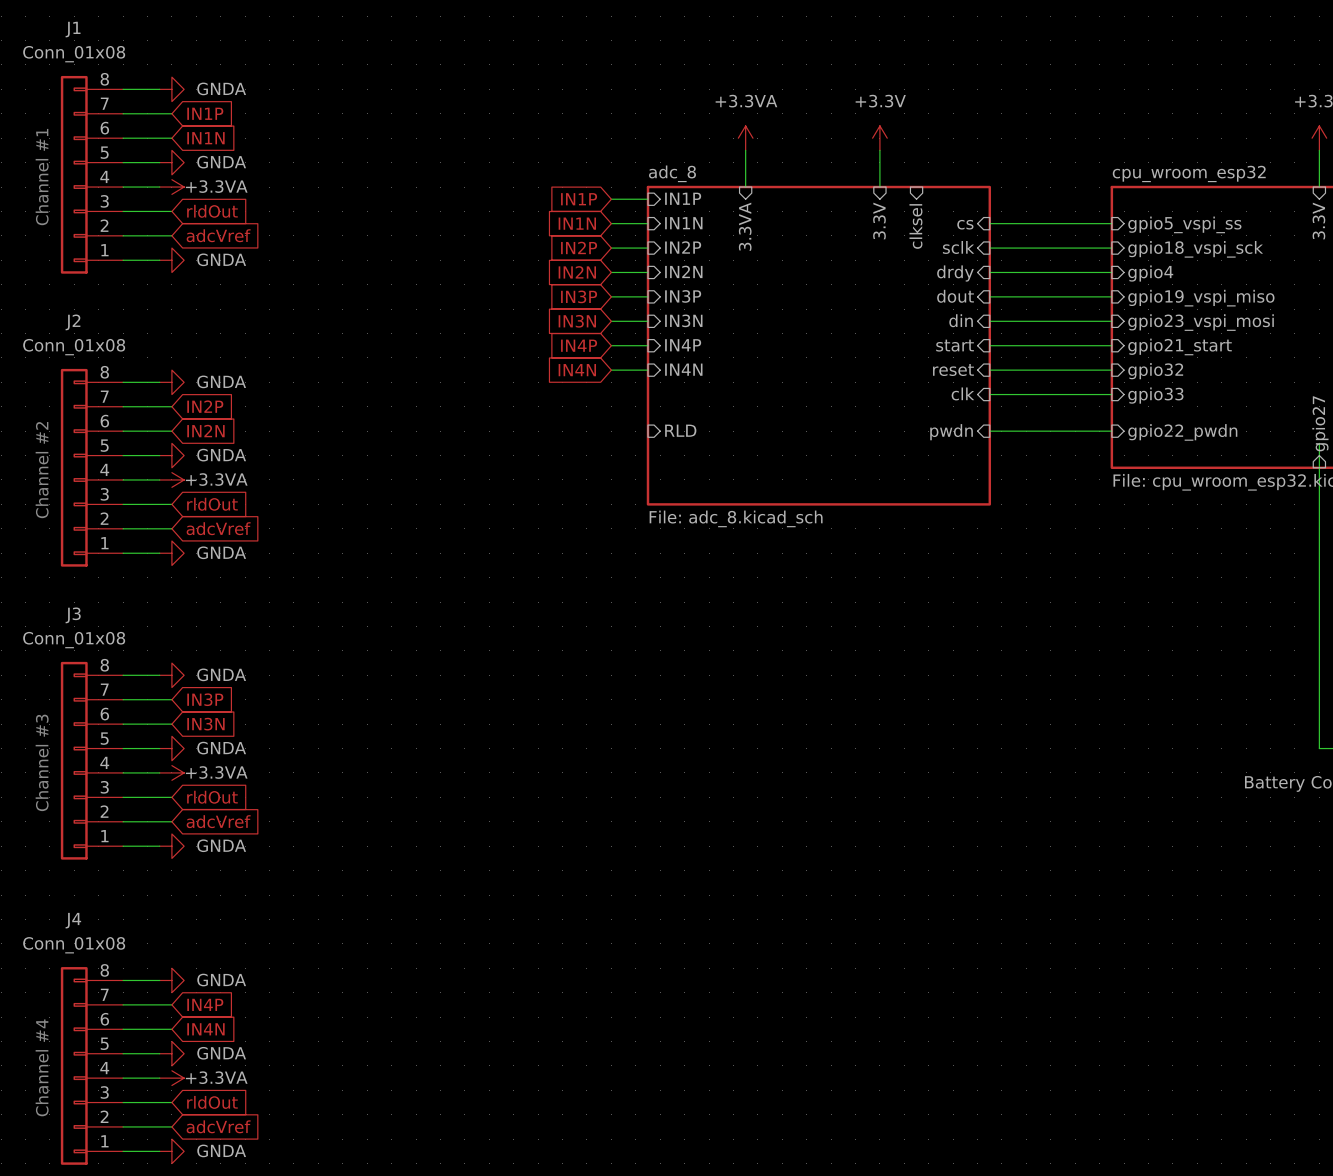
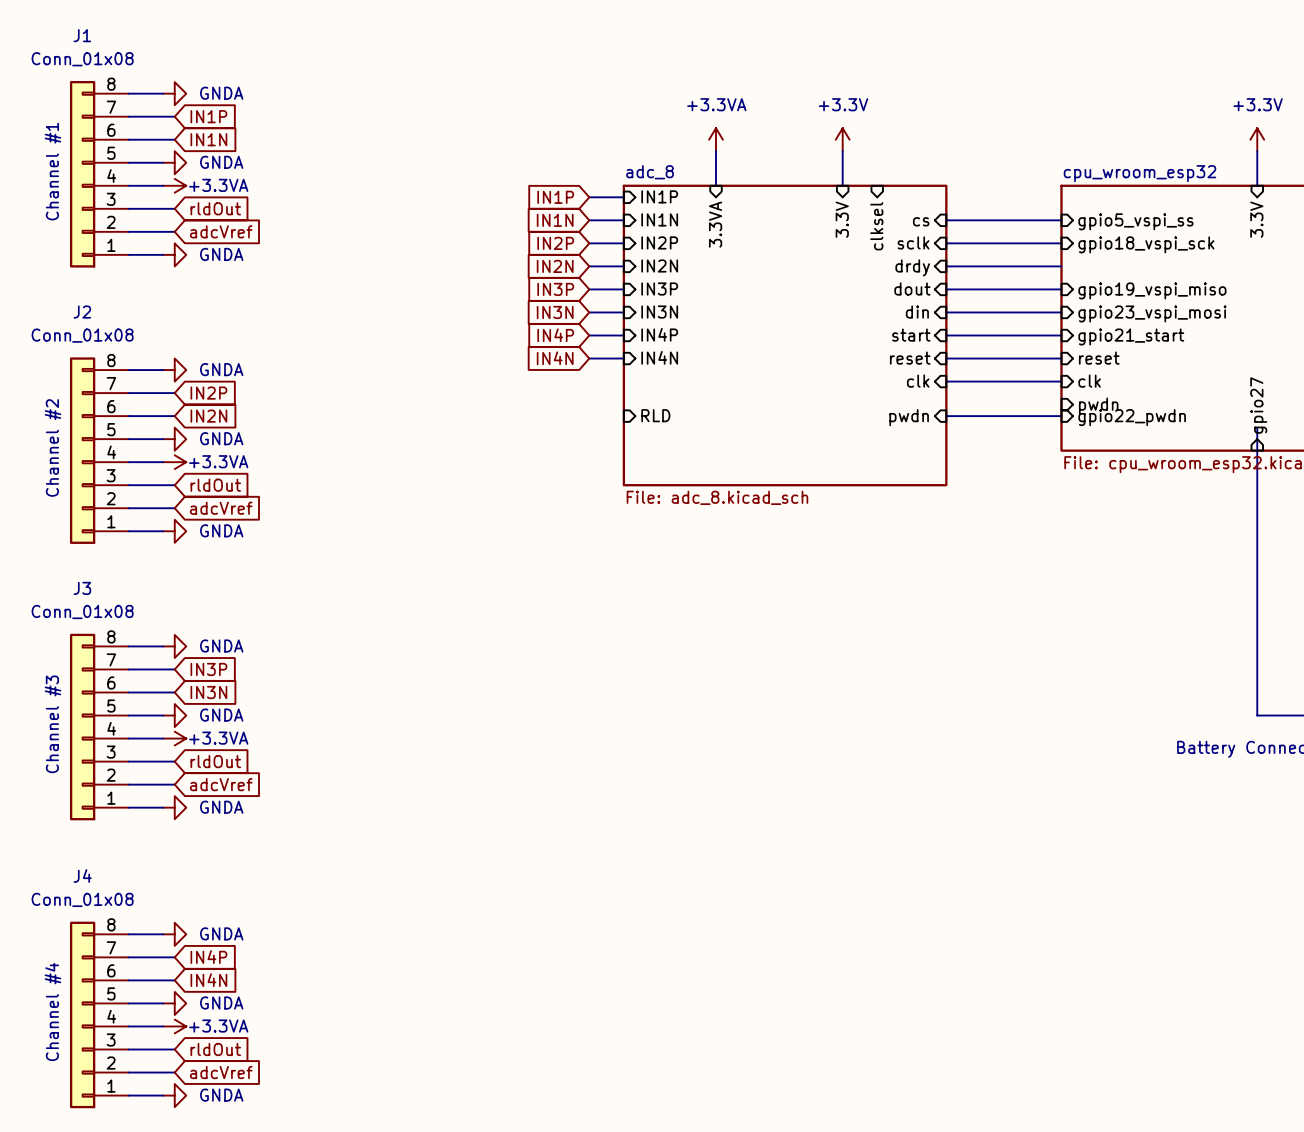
sheet pin: gpio4 (1150, 273) -> none
sheet pin: gpio32 (1155, 371) -> reset (1099, 358)
sheet pin: gpio33 (1155, 395) -> clk (1089, 381)
sheet pin: none -> pwdn (1098, 406)

